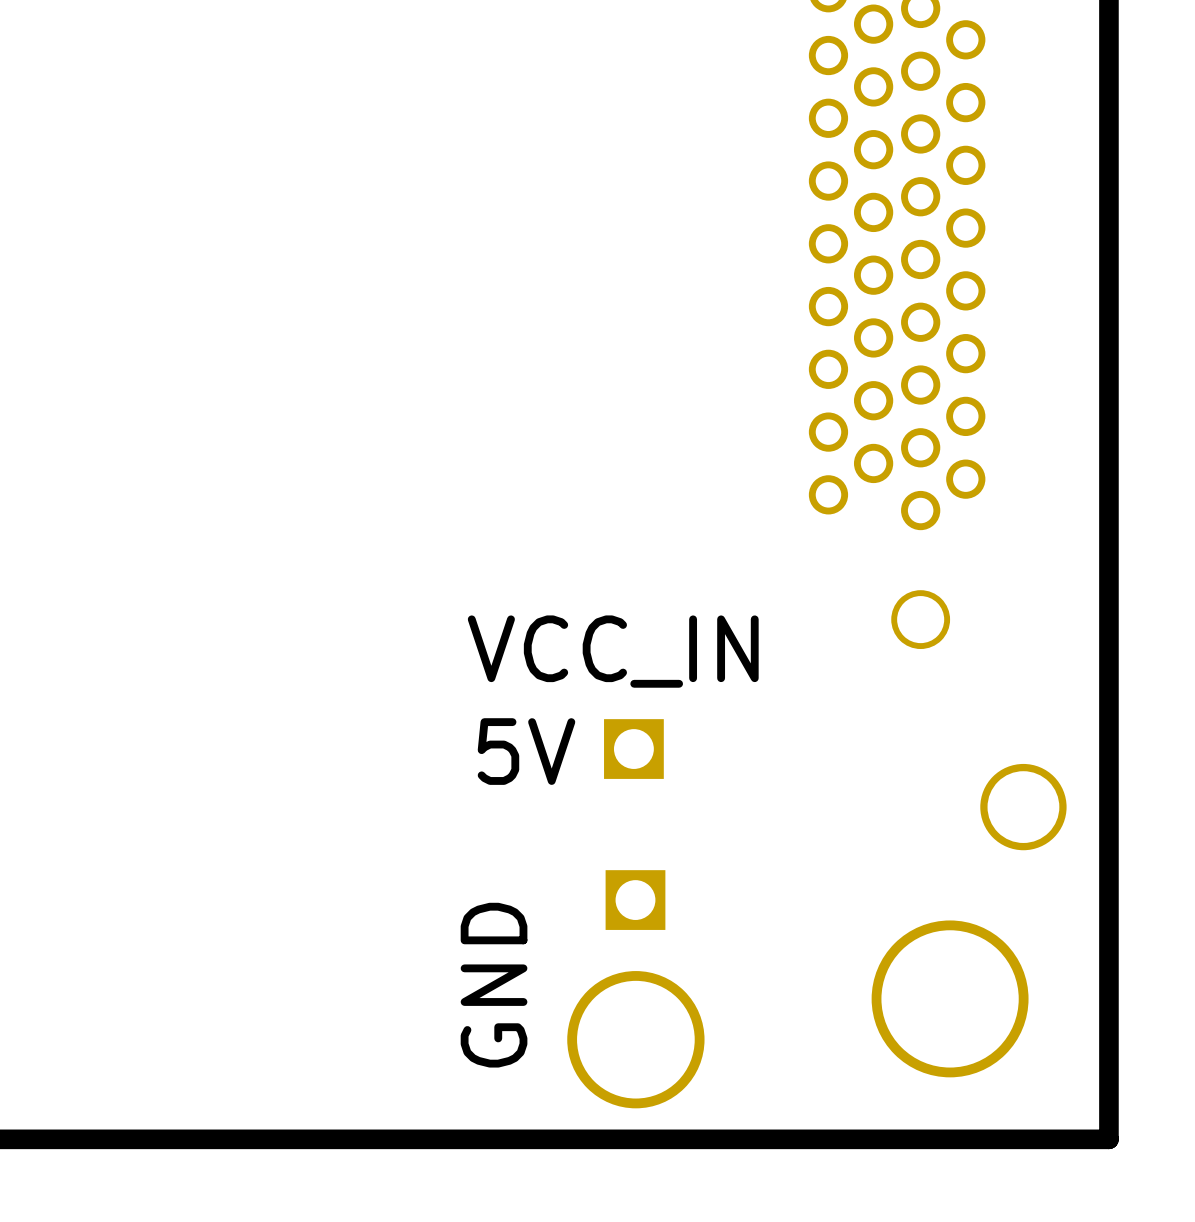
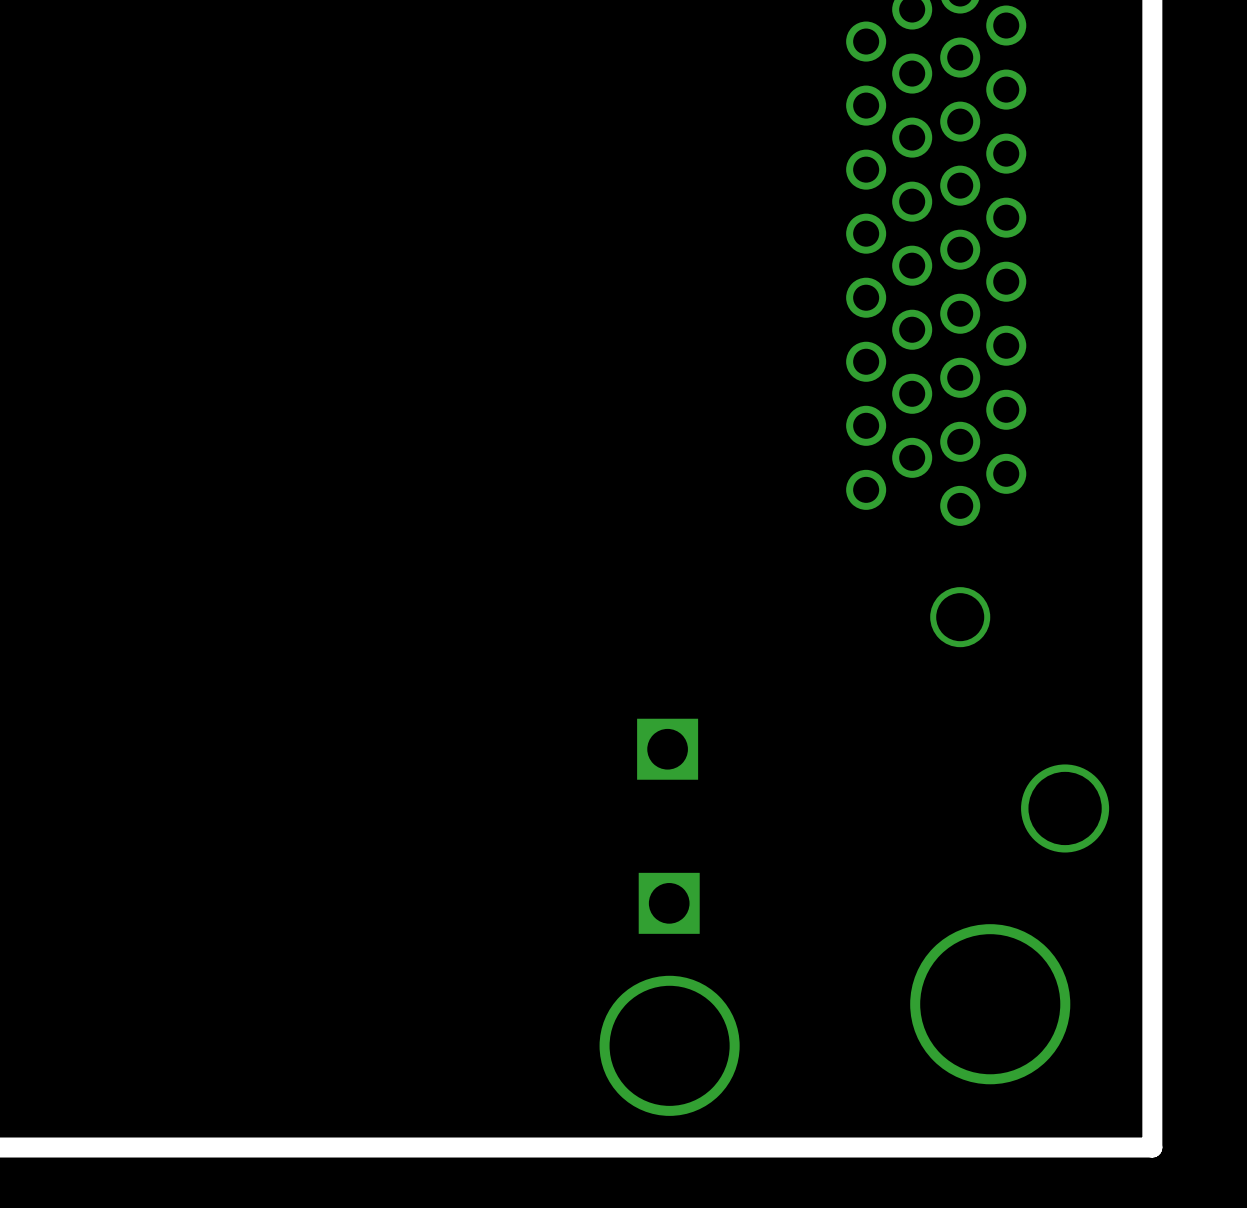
text: VCC_IN (613, 651) -> none
text: 5V (526, 751) -> none
text: GND (494, 985) -> none

